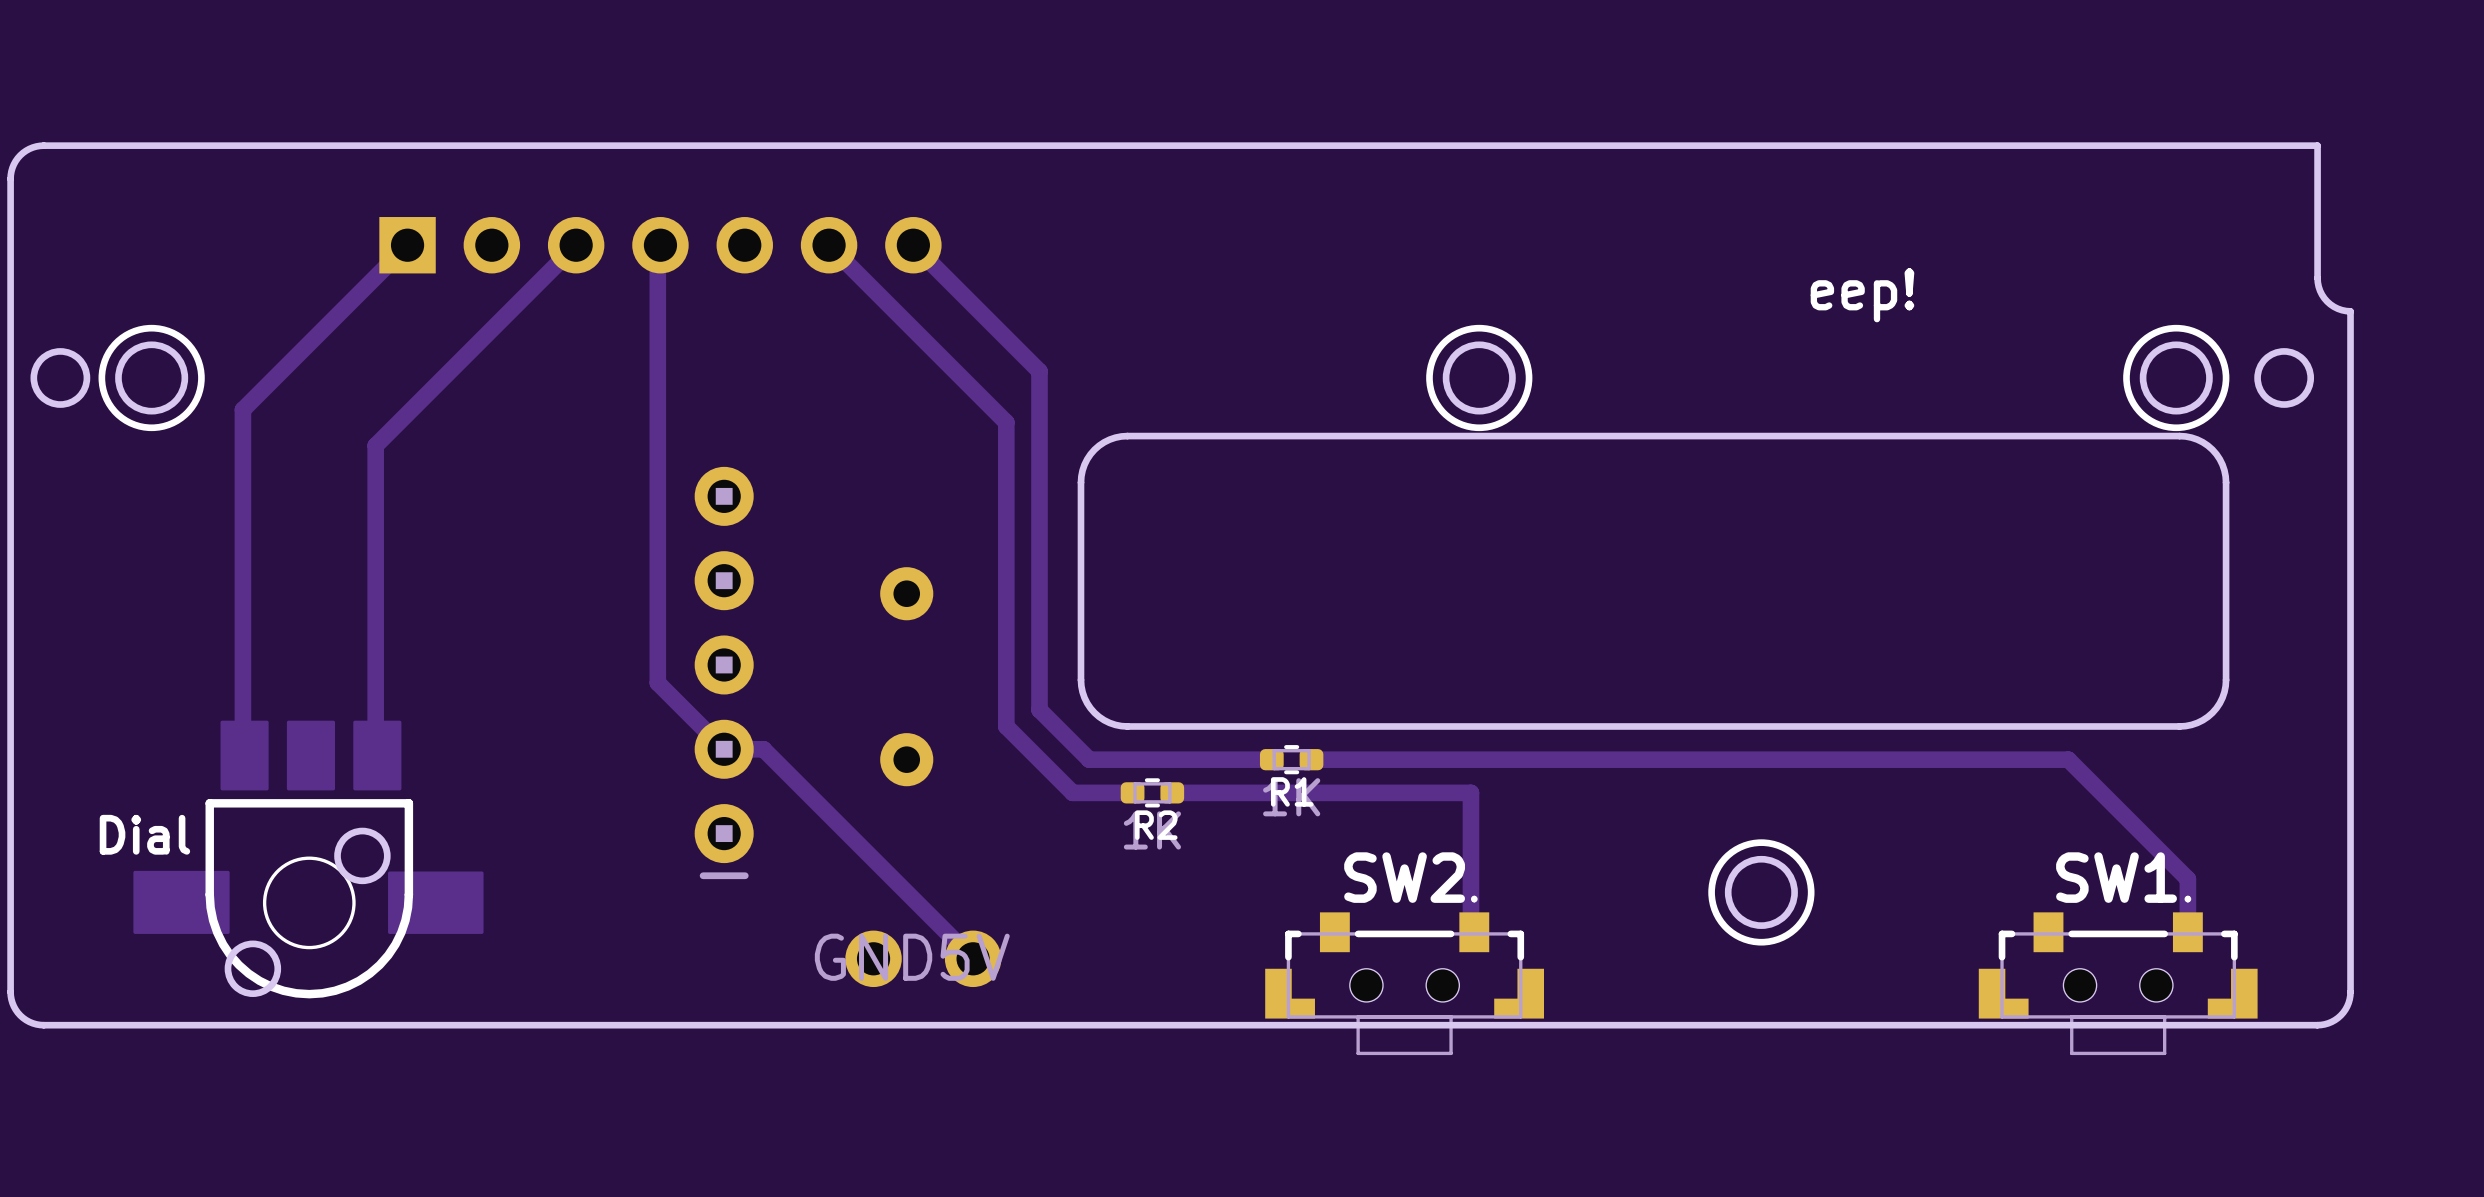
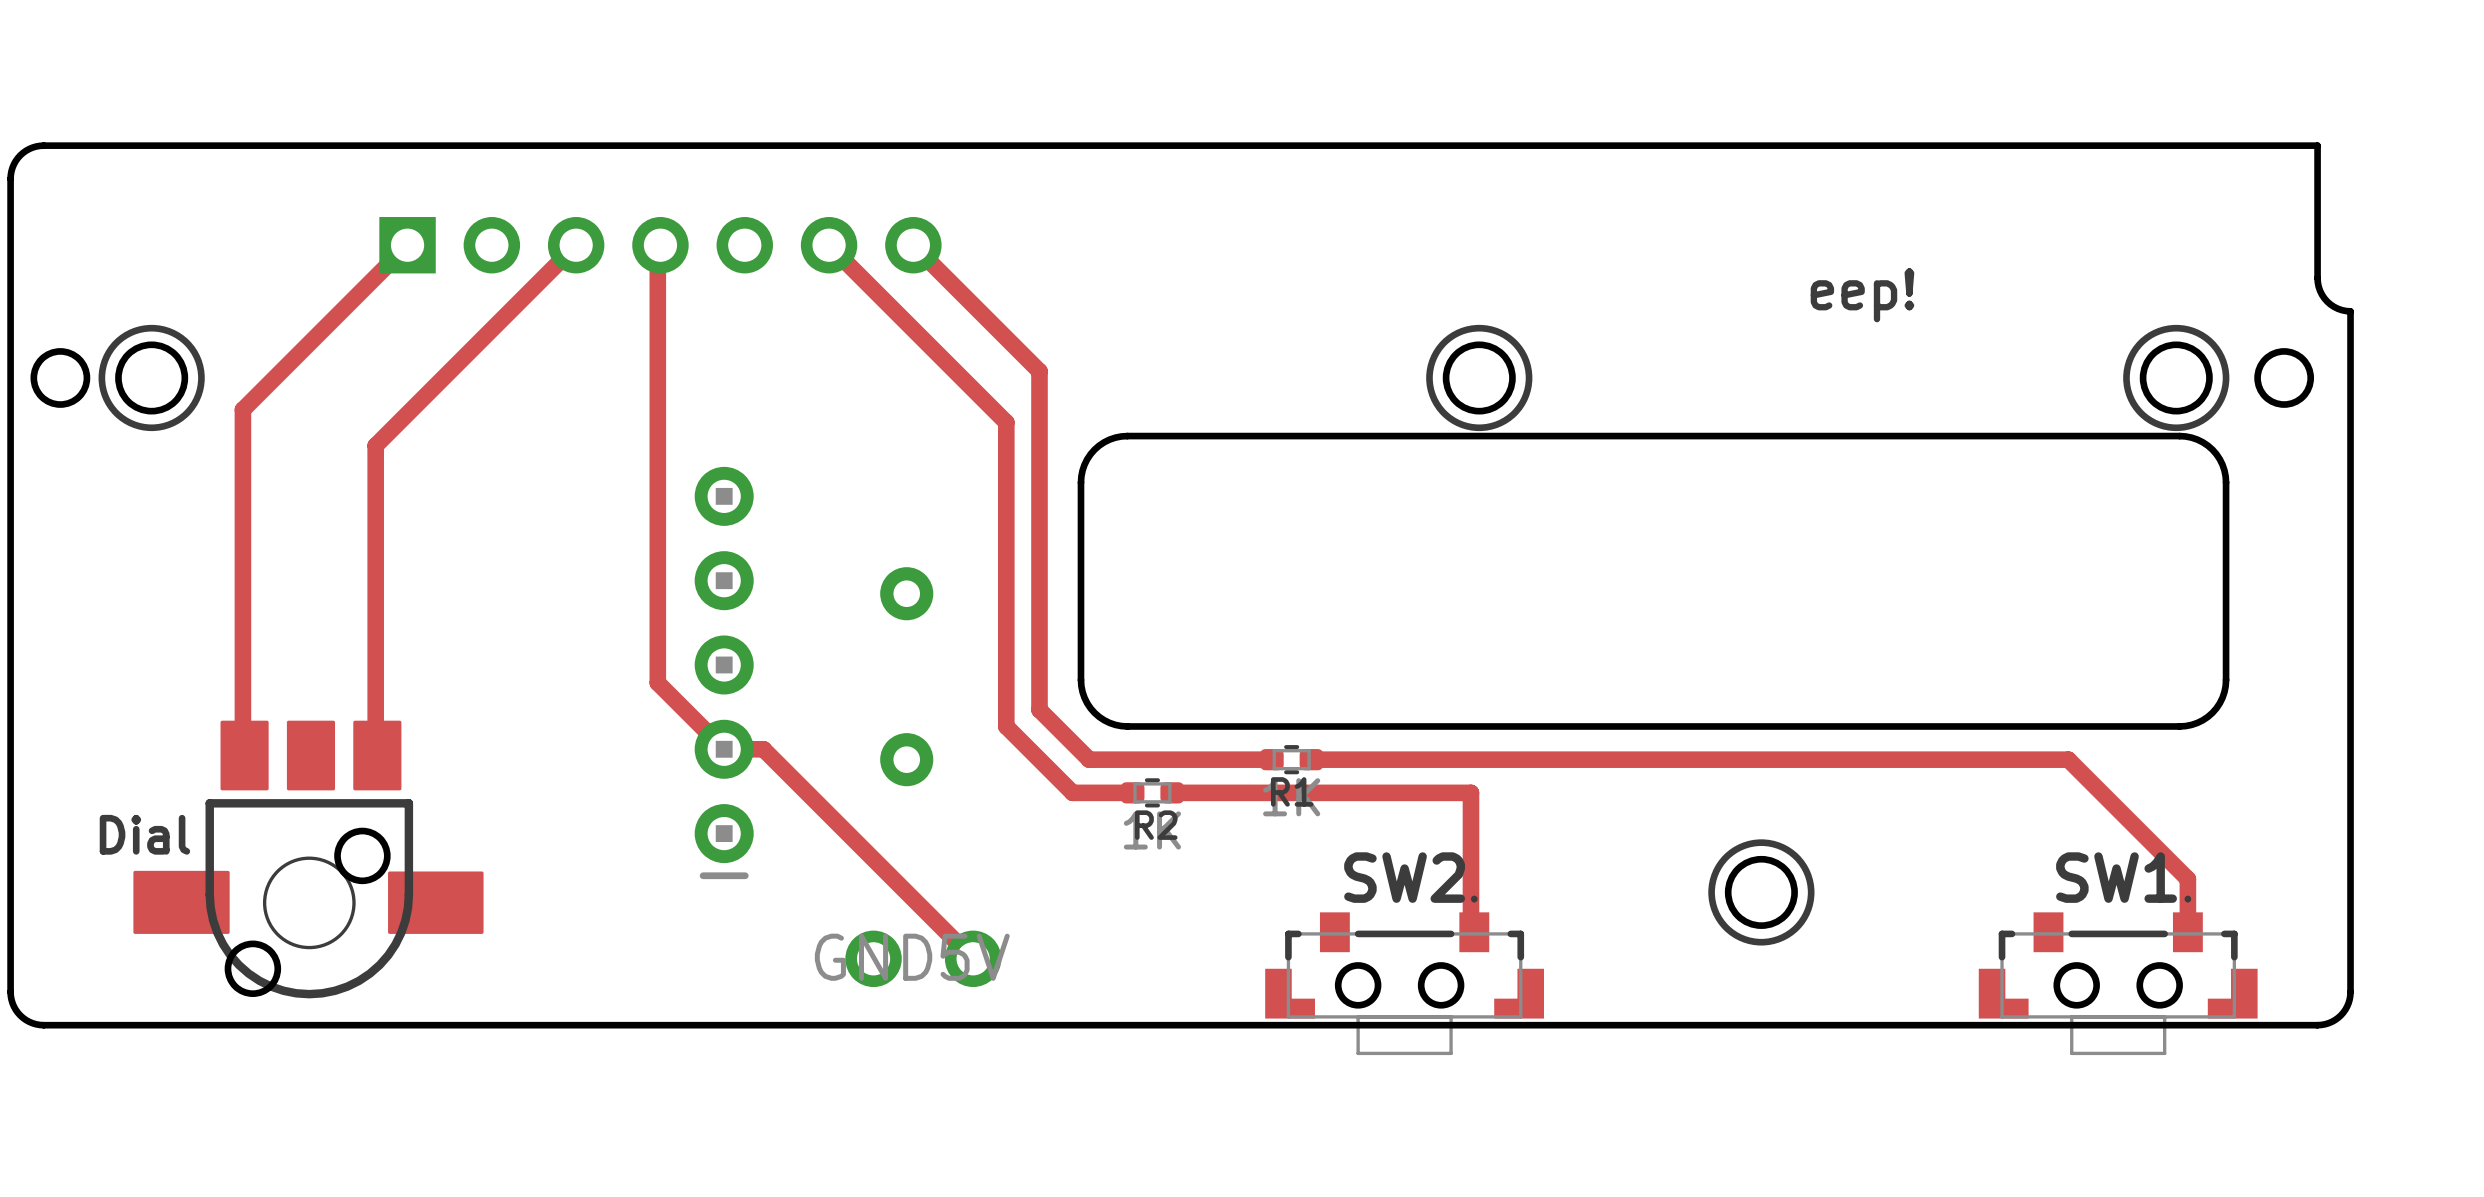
SW2 footprint: [1265, 895, 1544, 1056] -> [1265, 895, 1544, 1056]
SW1 footprint: [1978, 895, 2258, 1056] -> [1978, 895, 2258, 1056]
round board edge: none -> [1334, 962, 1382, 1009]
round board edge: none -> [1417, 962, 1465, 1009]
round board edge: none -> [2053, 962, 2100, 1009]
round board edge: none -> [2136, 962, 2183, 1009]

